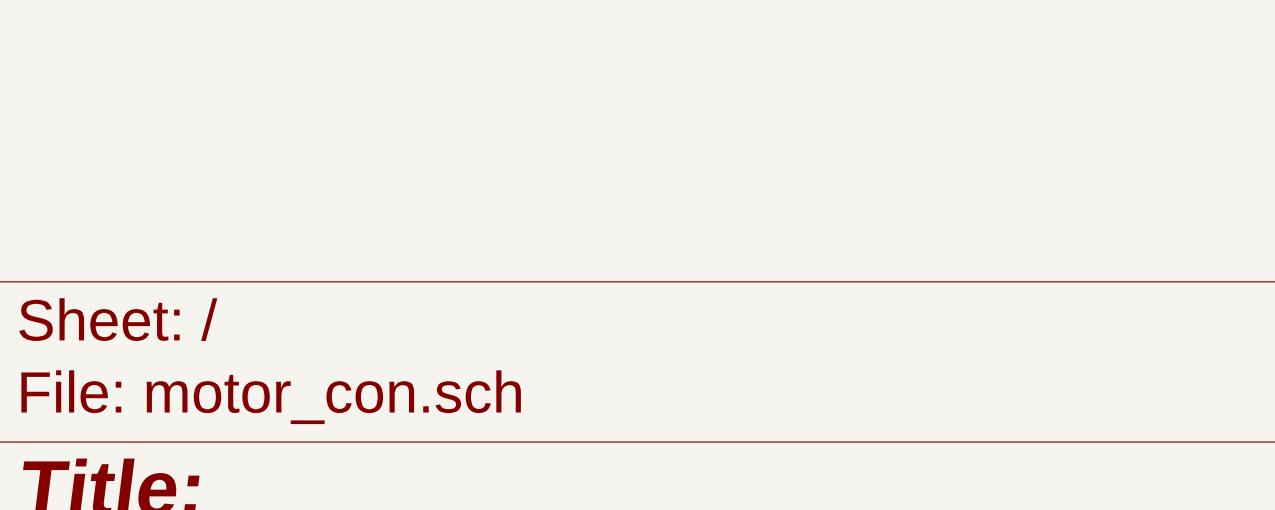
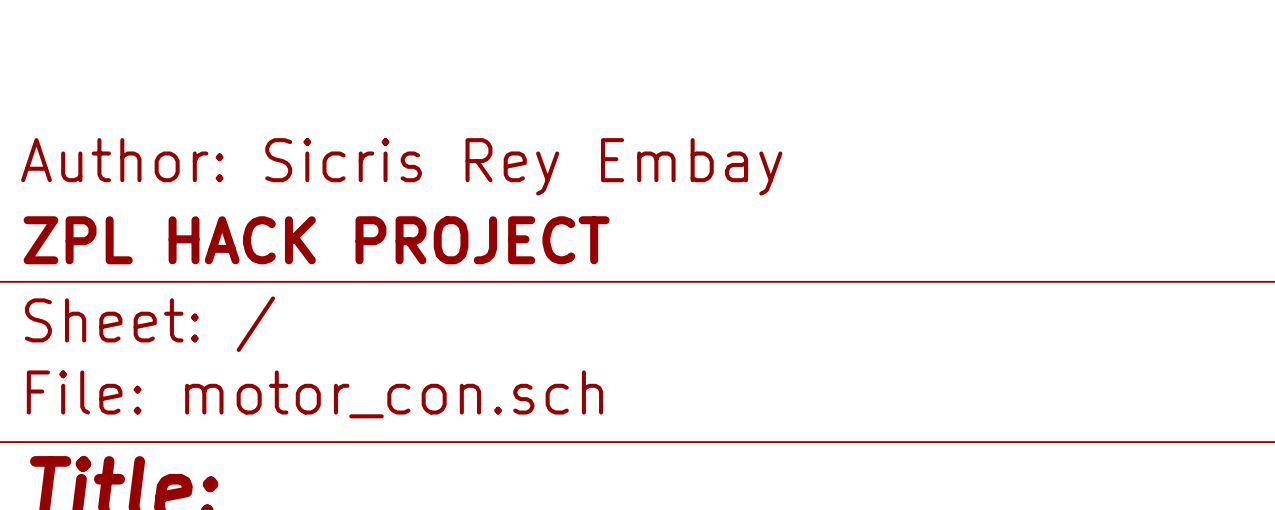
title block: none -> Author: Sicris Rey Embay (401, 166)
title block: none -> ZPL HACK PROJECT (316, 240)

